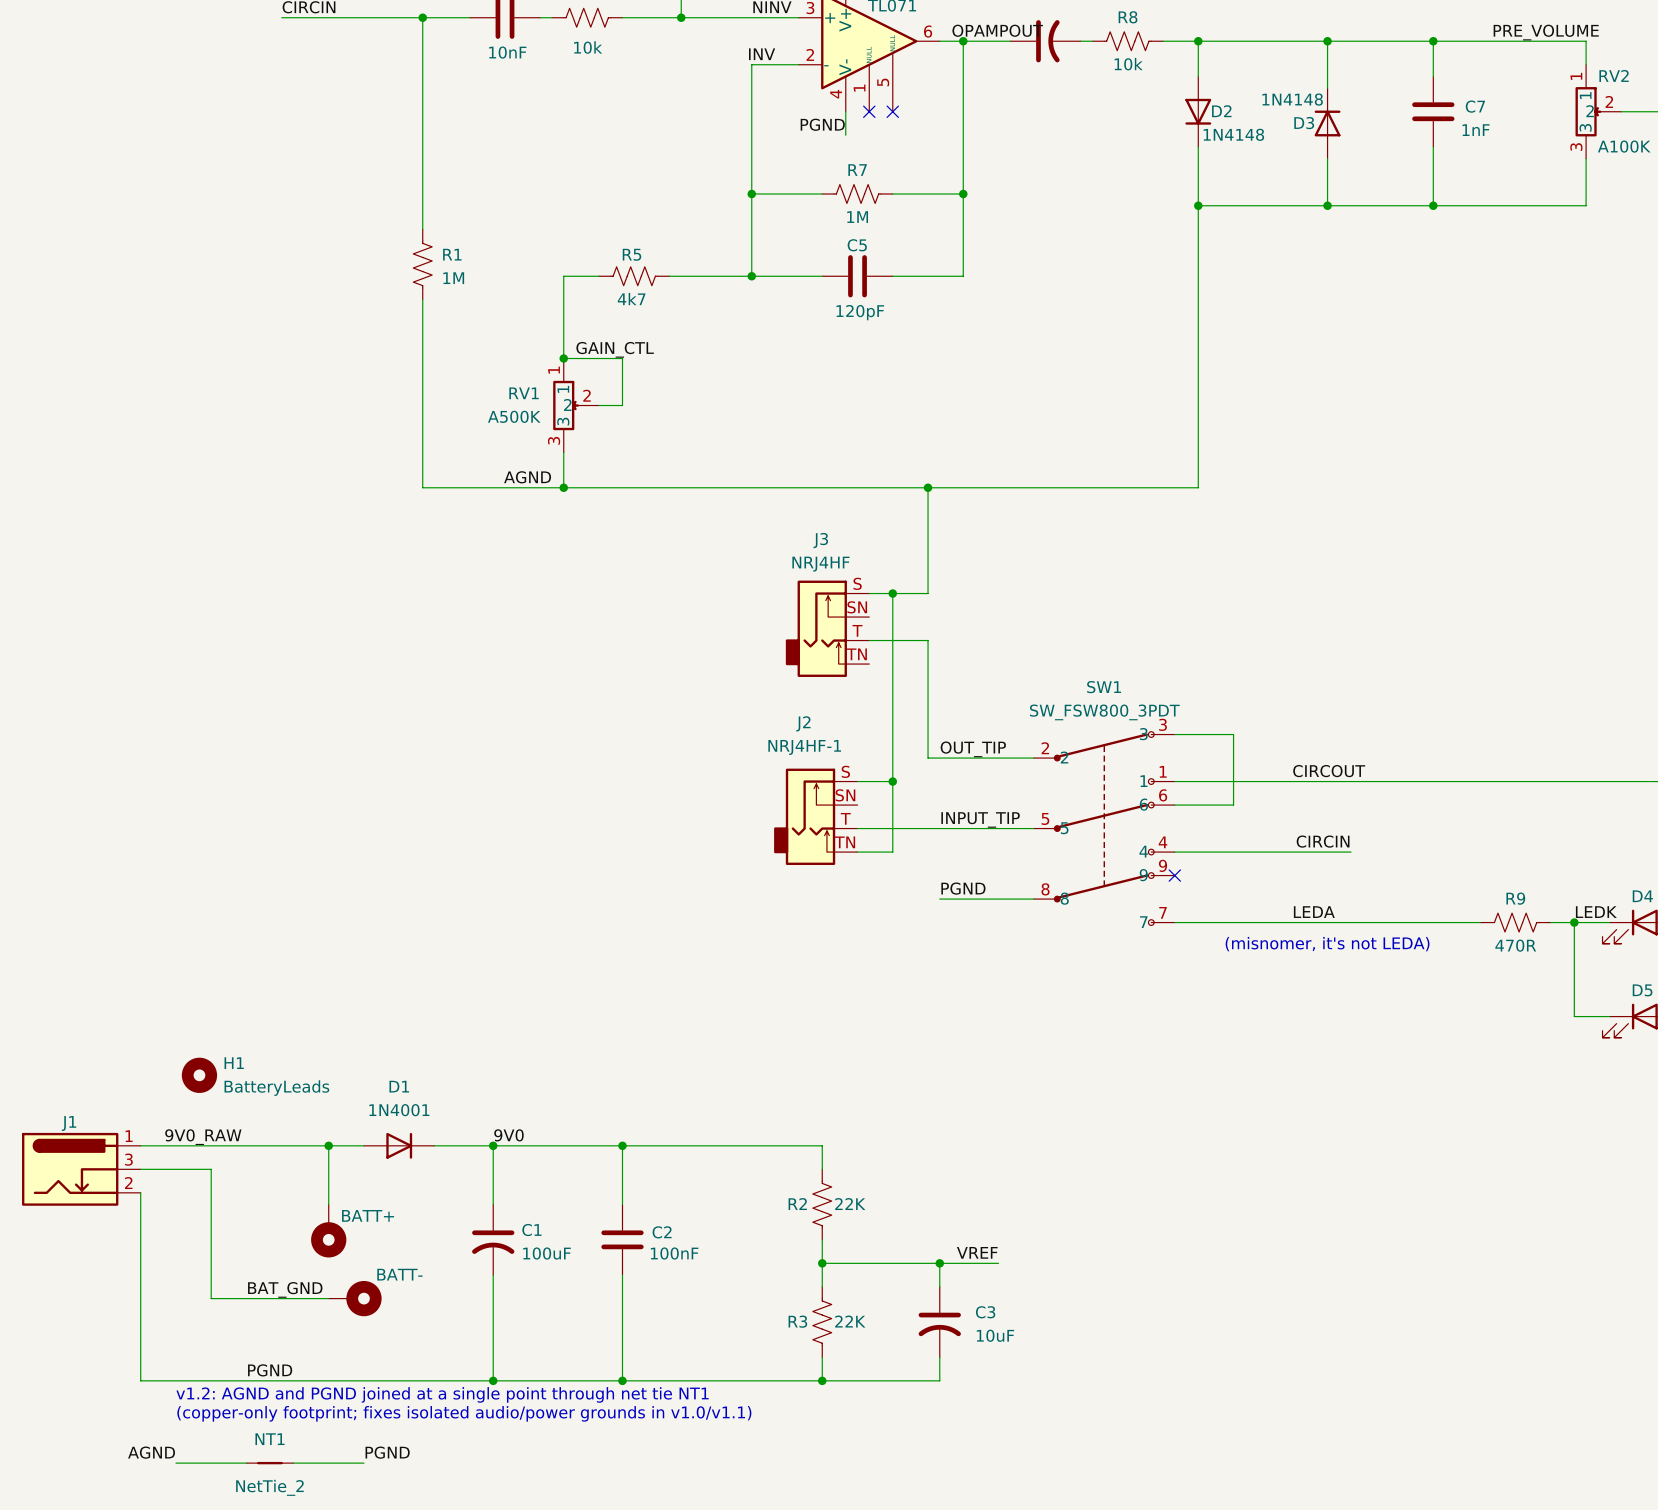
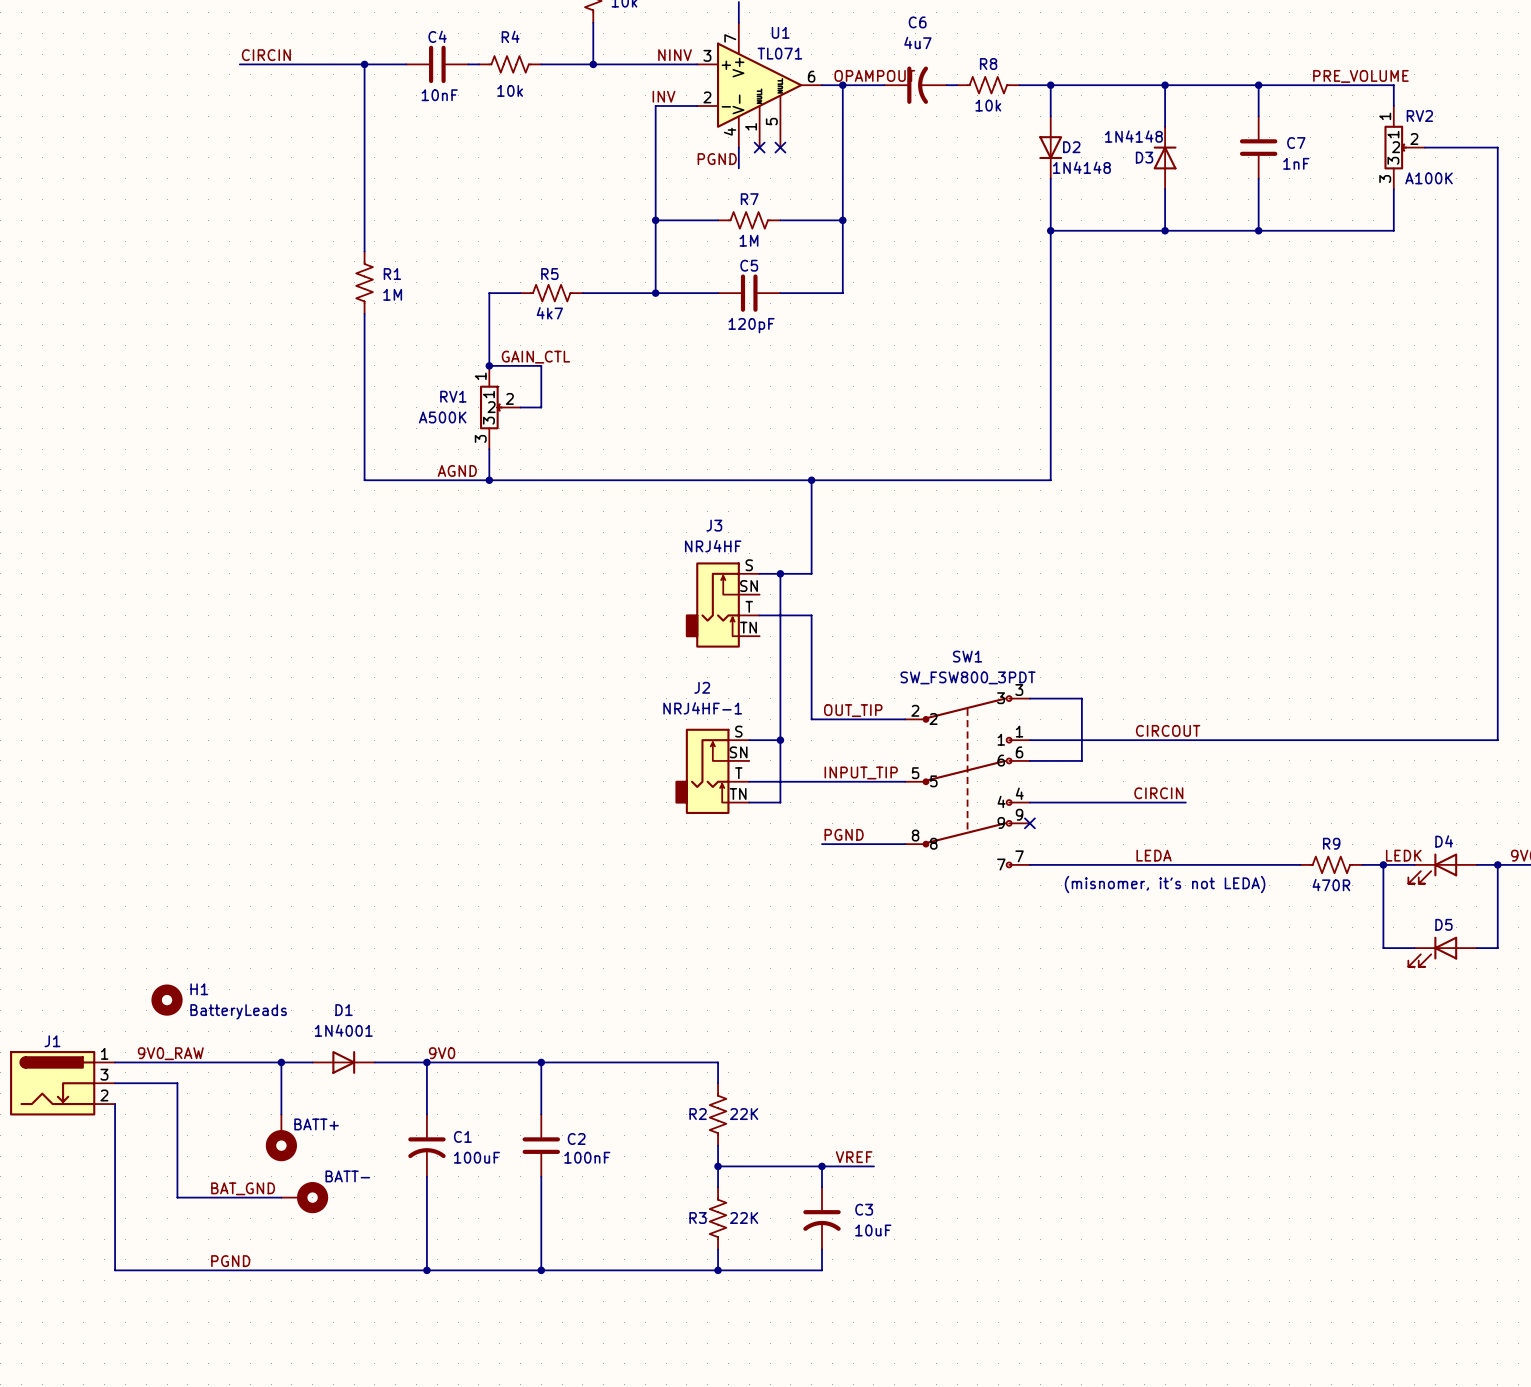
text: v1.2: AGND and PGND joined at a single point through net tie NT1 (442, 1394) -> none
text: (copper-only footprint; fixes isolated audio/power grounds in v1.0/v1.1) (464, 1413) -> none
label: AGND (151, 1452) -> none
label: PGND (387, 1452) -> none
wire: (175, 1463) (246, 1463) -> none
NT1: NetTie_2 (269, 1463) -> none
wire: (293, 1463) (363, 1463) -> none

